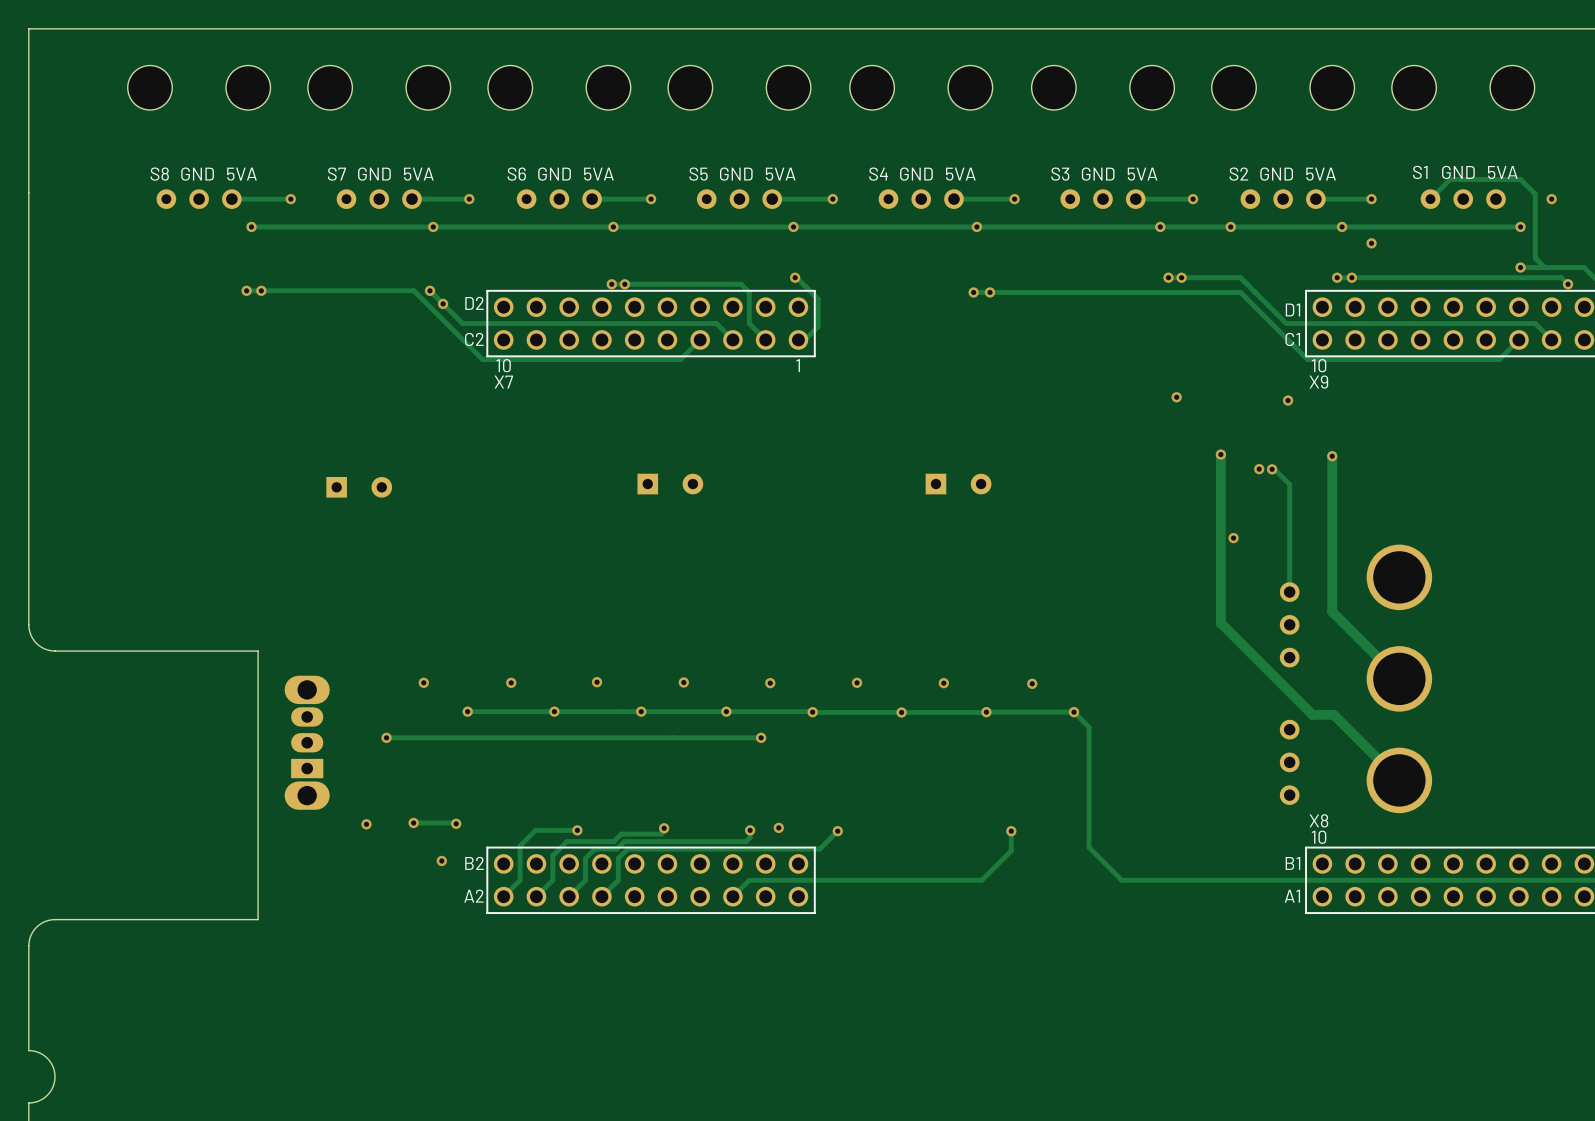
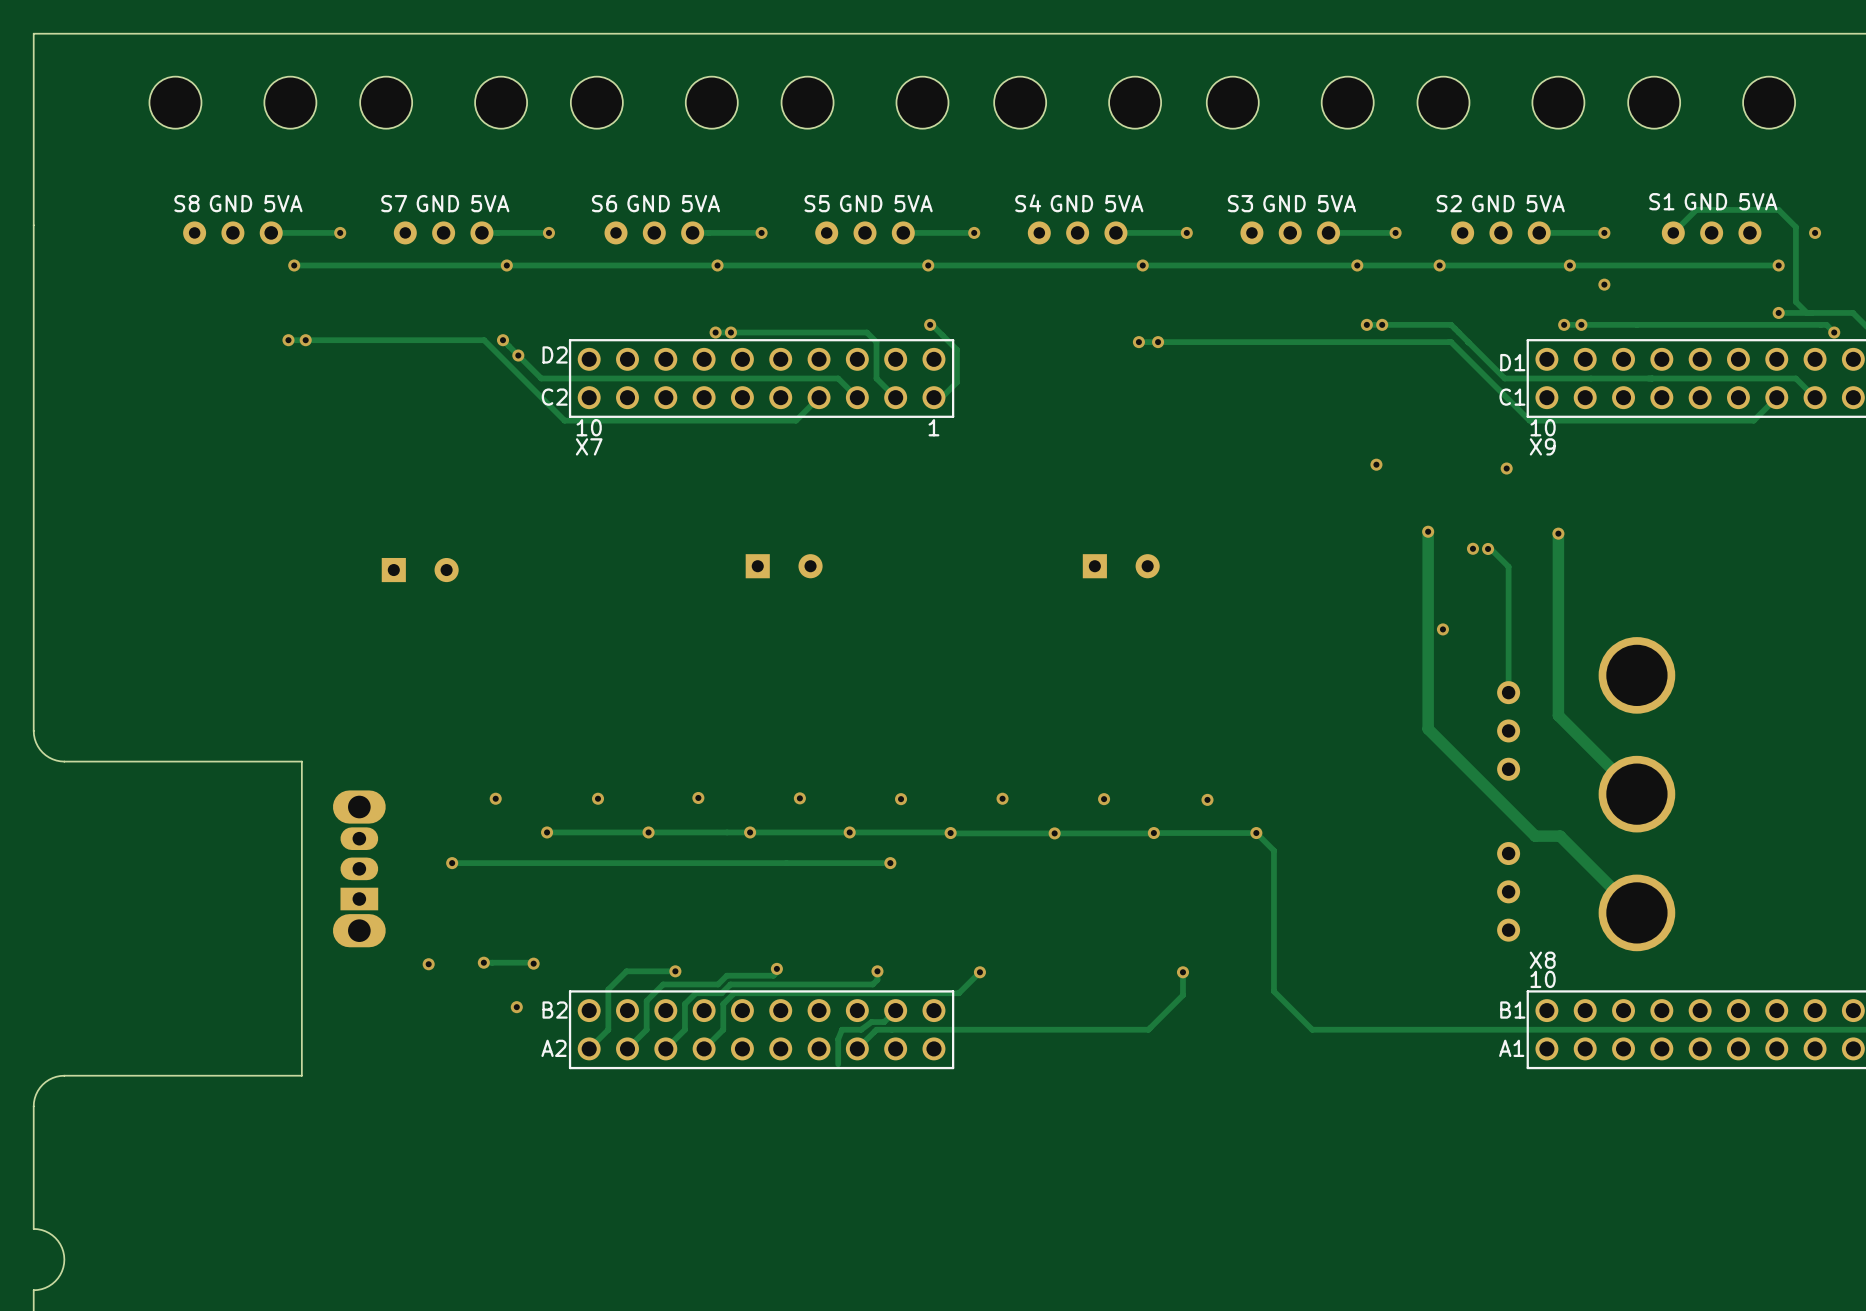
via: (778, 827) -> none
track: none -> (895, 1010) (884, 1022) (871, 1022) (861, 1029) (842, 1029) (838, 1039) (838, 1064)

